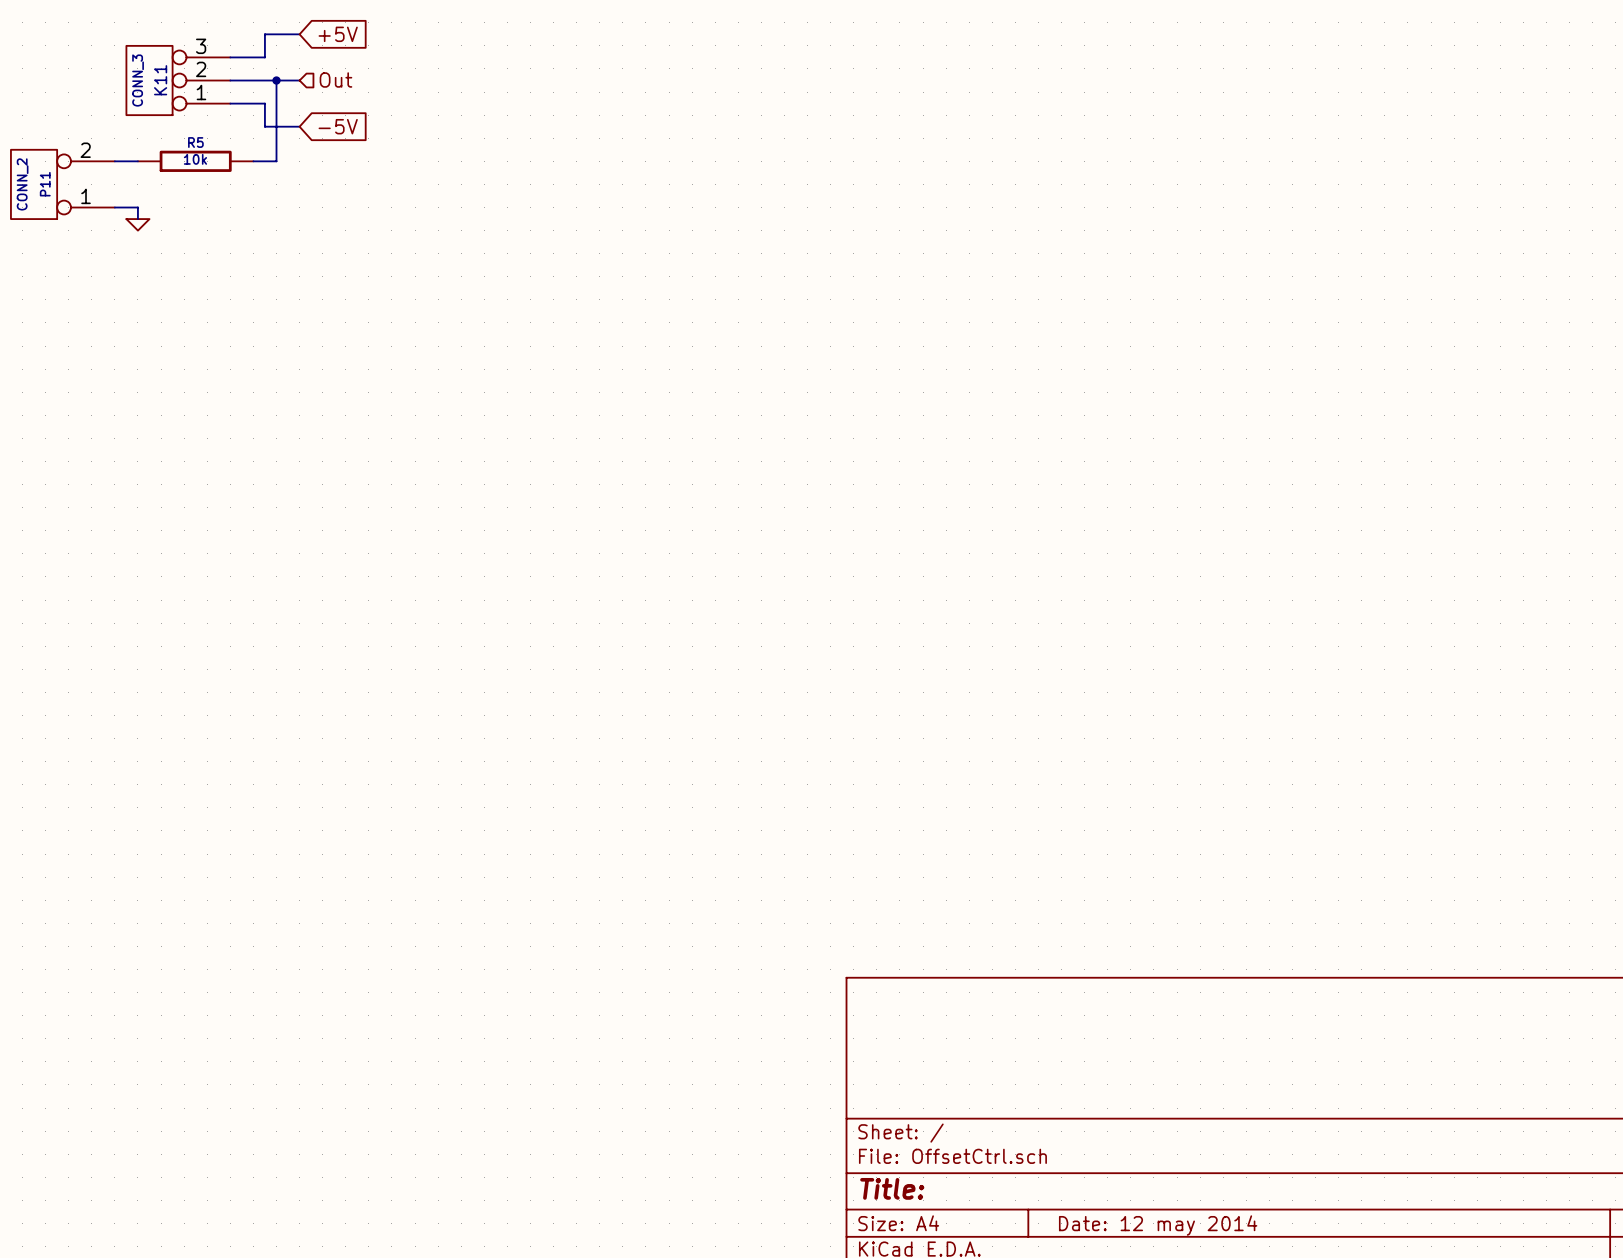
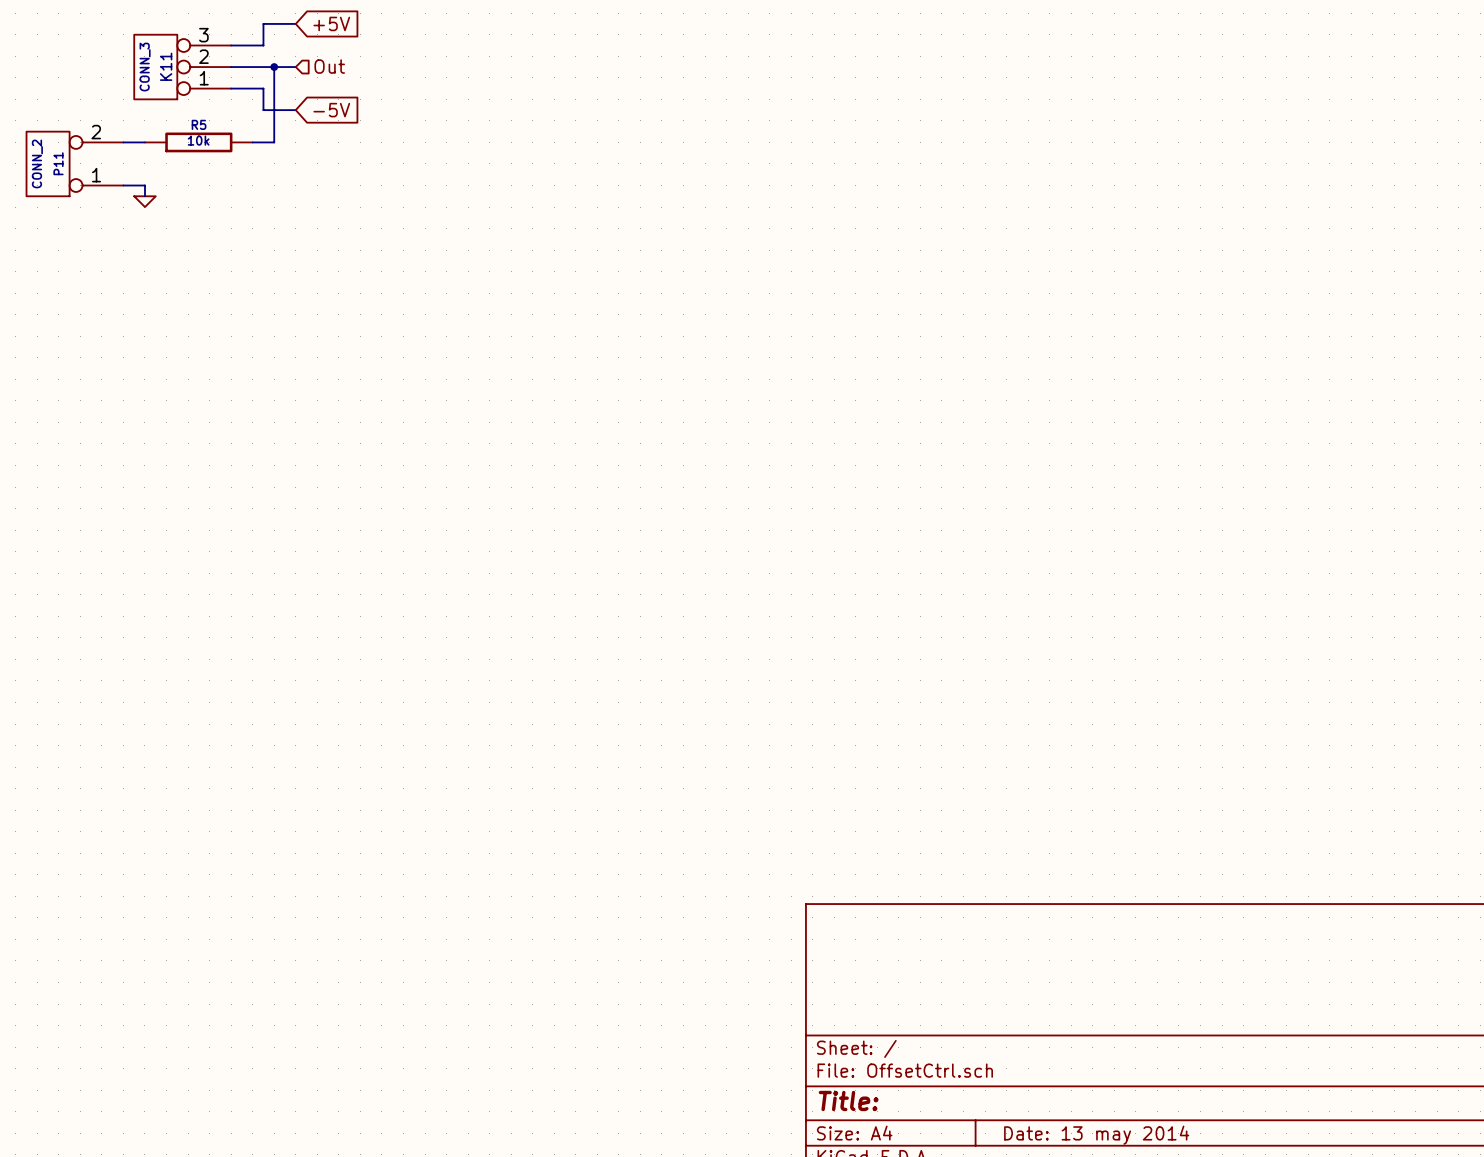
title block: Date: 12 may 2014 (1158, 1225) -> Date: 13 may 2014 (1096, 1135)

